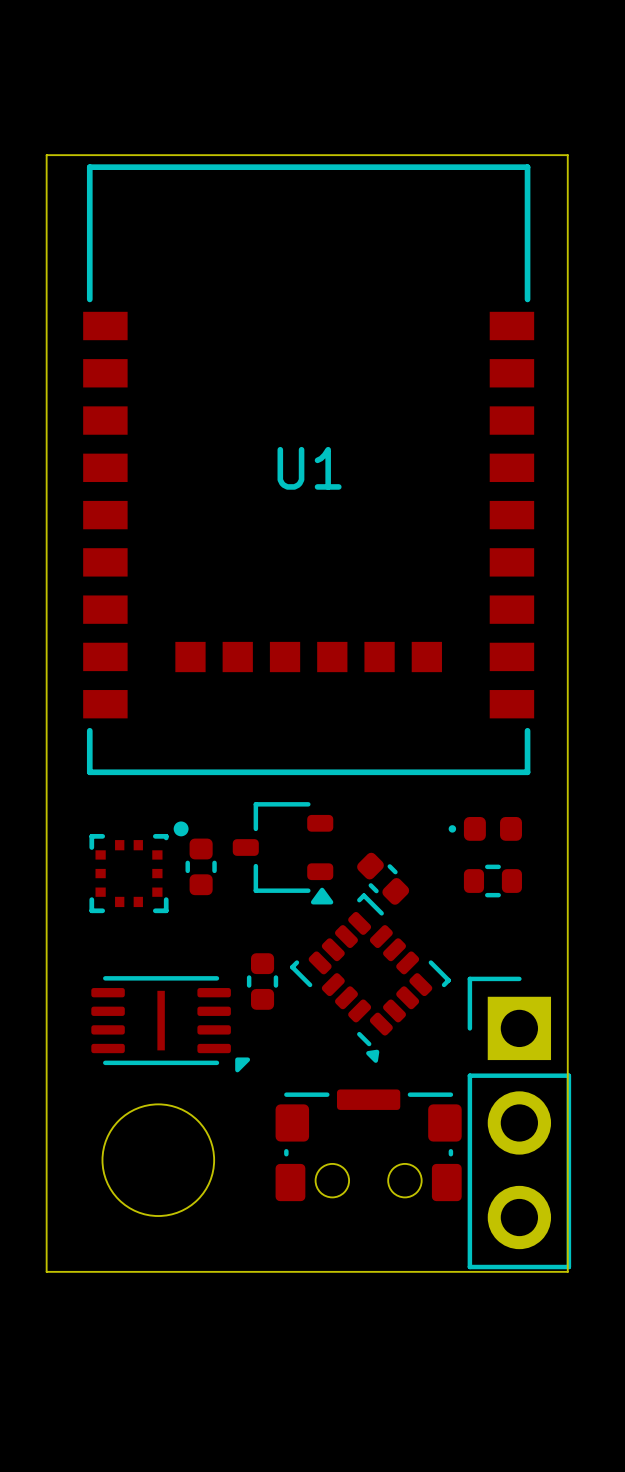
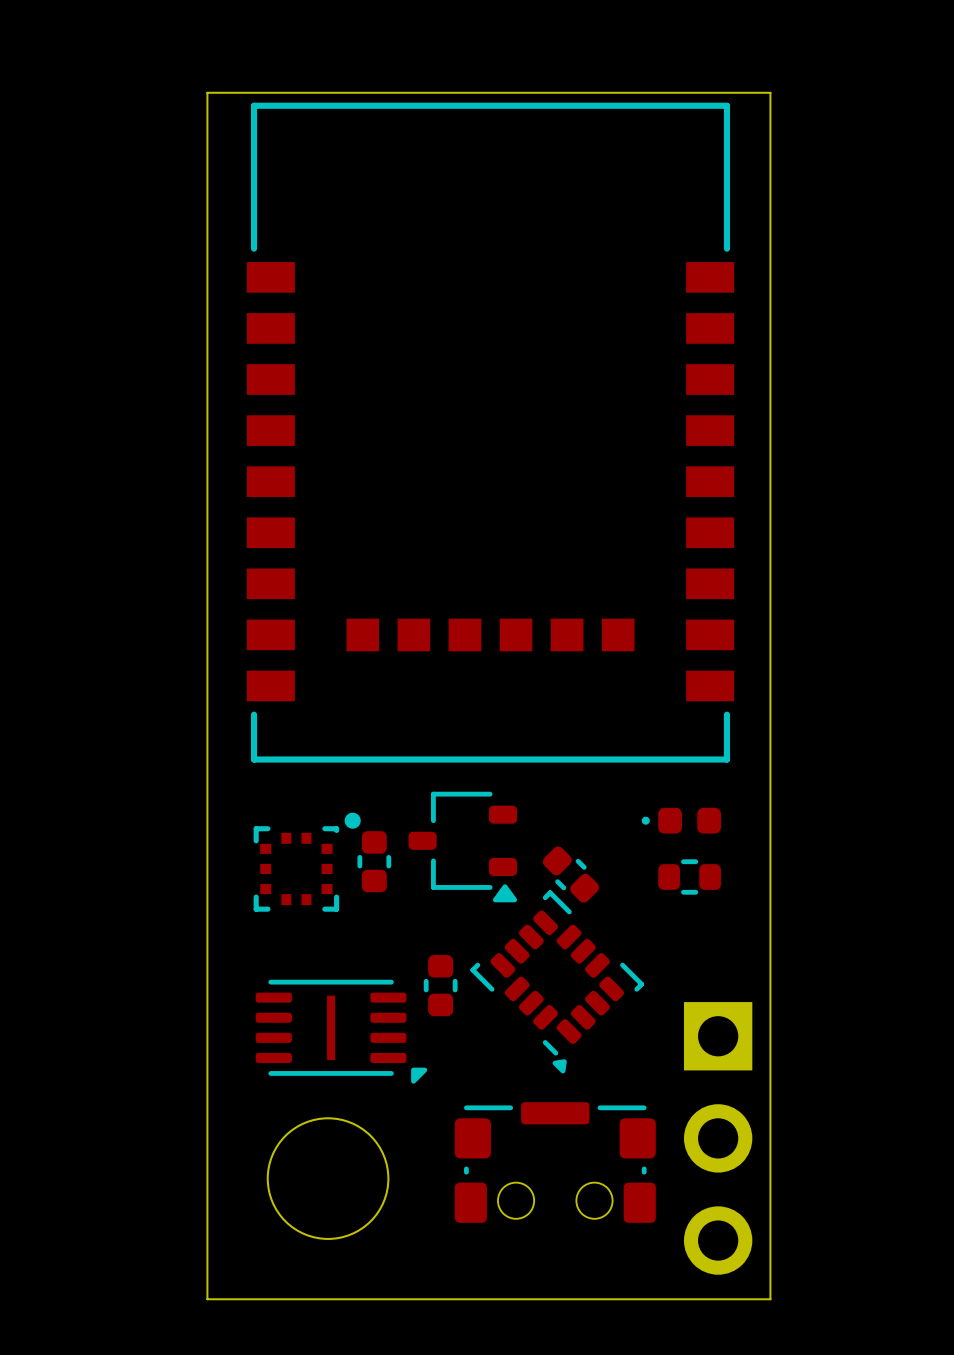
U1 name: U1 (309, 468) -> none
part footprint: [467, 976, 572, 1270] -> [683, 1002, 753, 1275]

